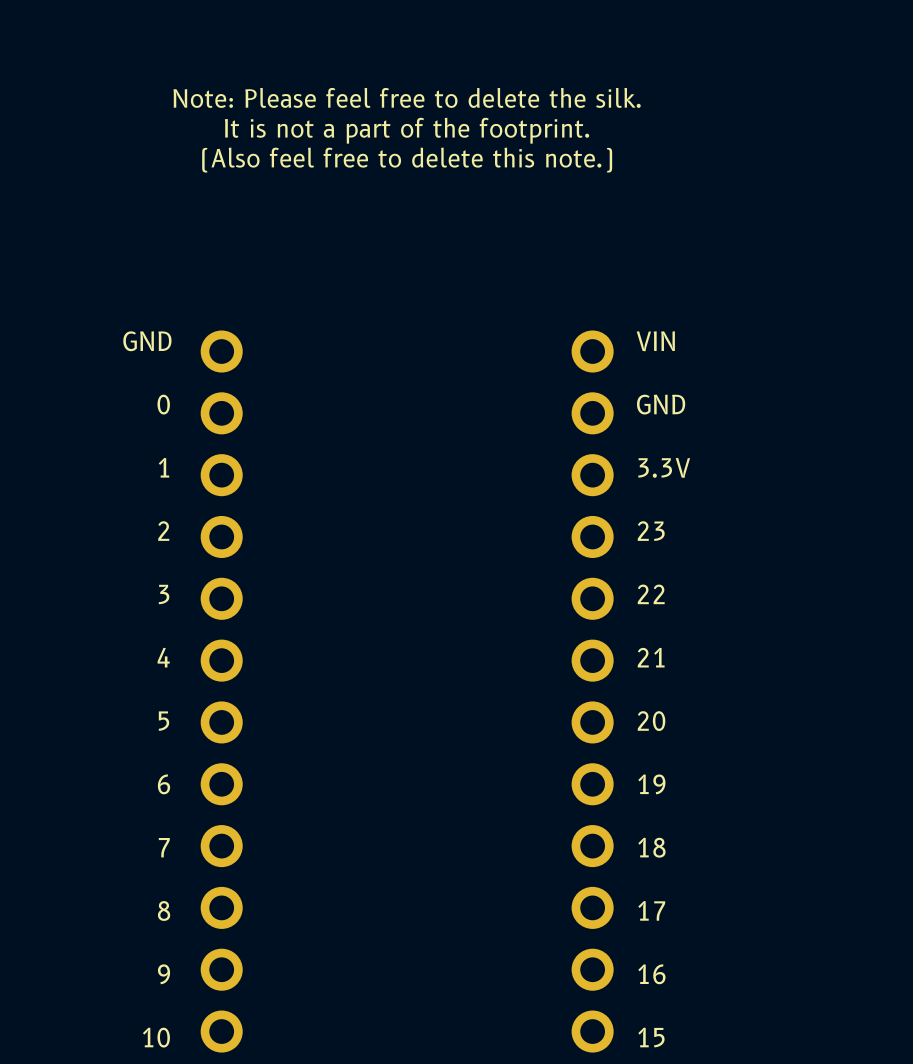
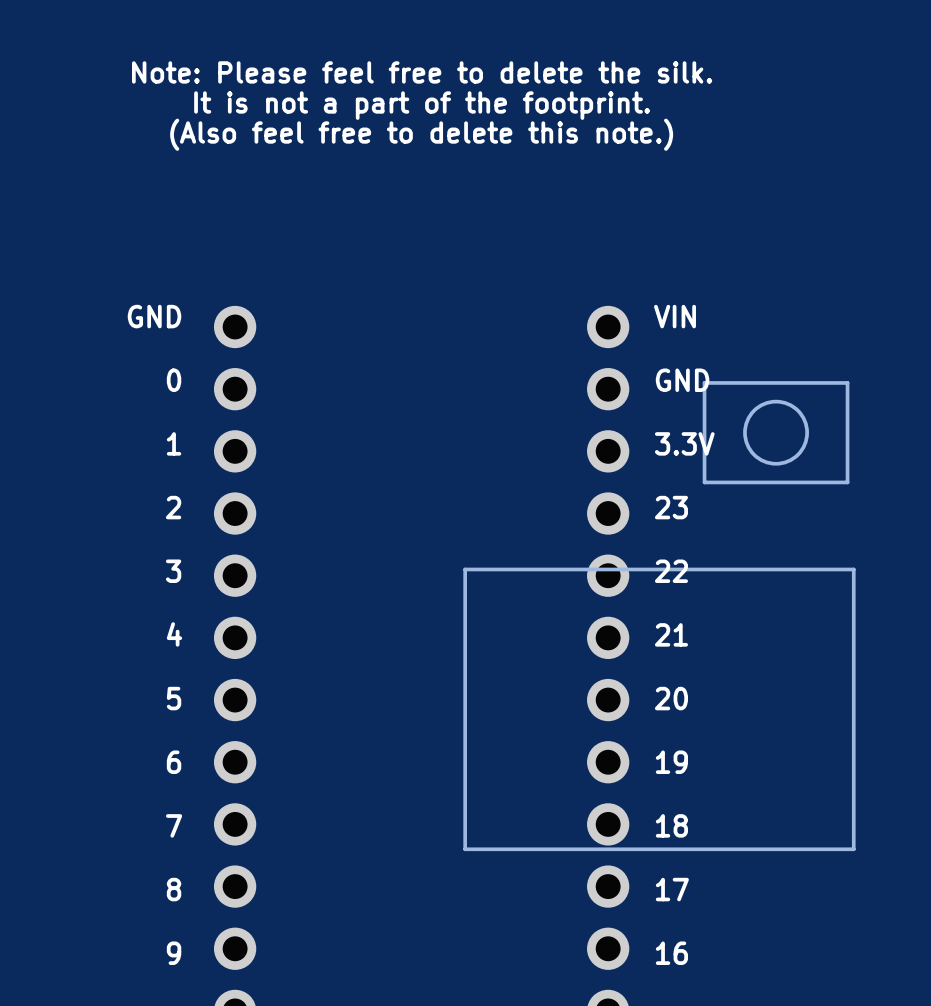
line: none -> (704, 382) (704, 482) (847, 482) (847, 382) (704, 382)
drawing: none -> [743, 399, 809, 466]
line: none -> (465, 569) (465, 849) (853, 849) (853, 569) (465, 569)

